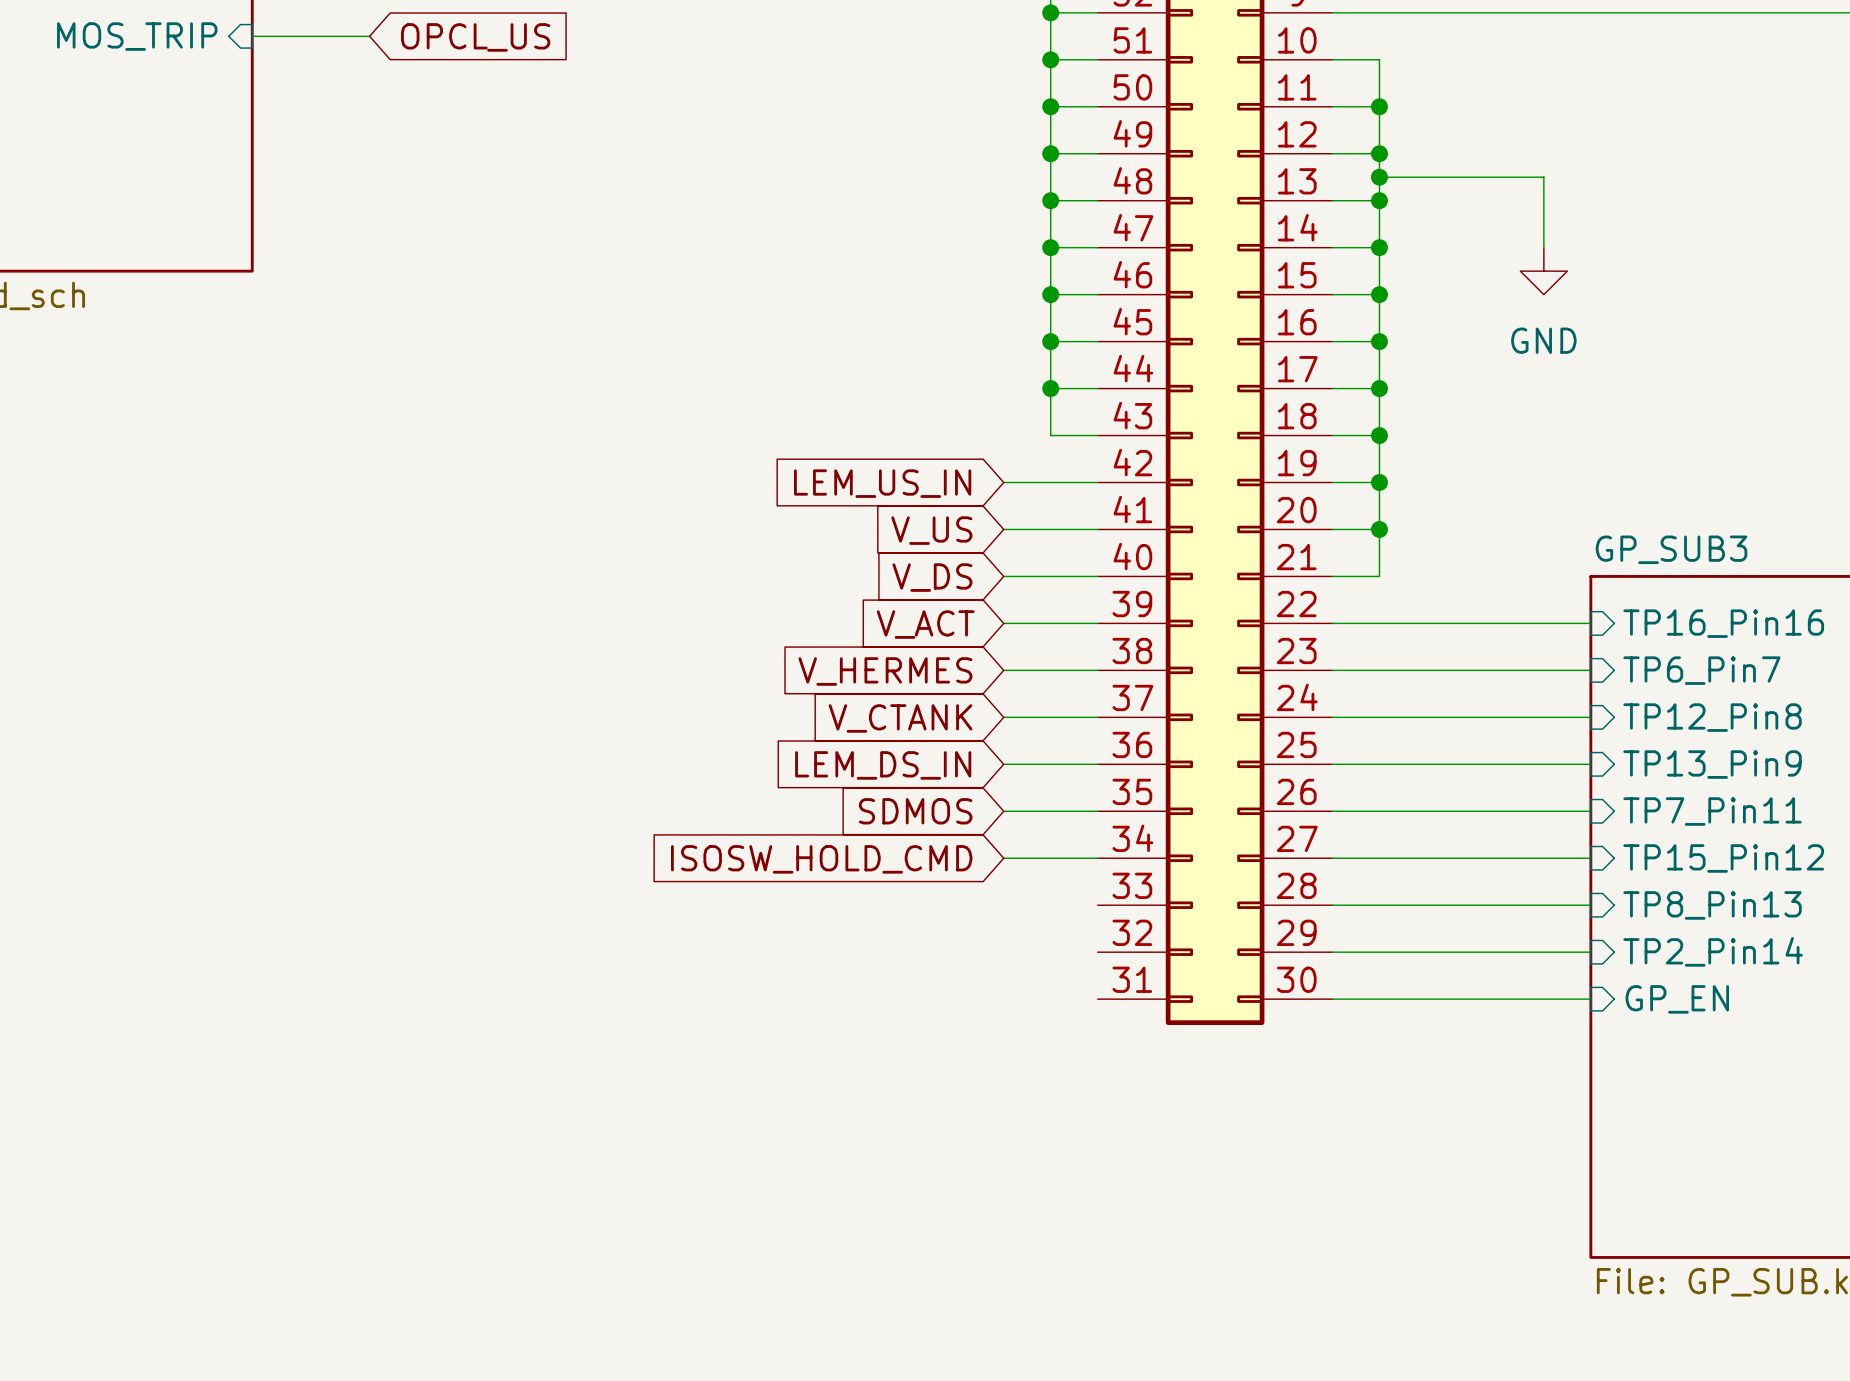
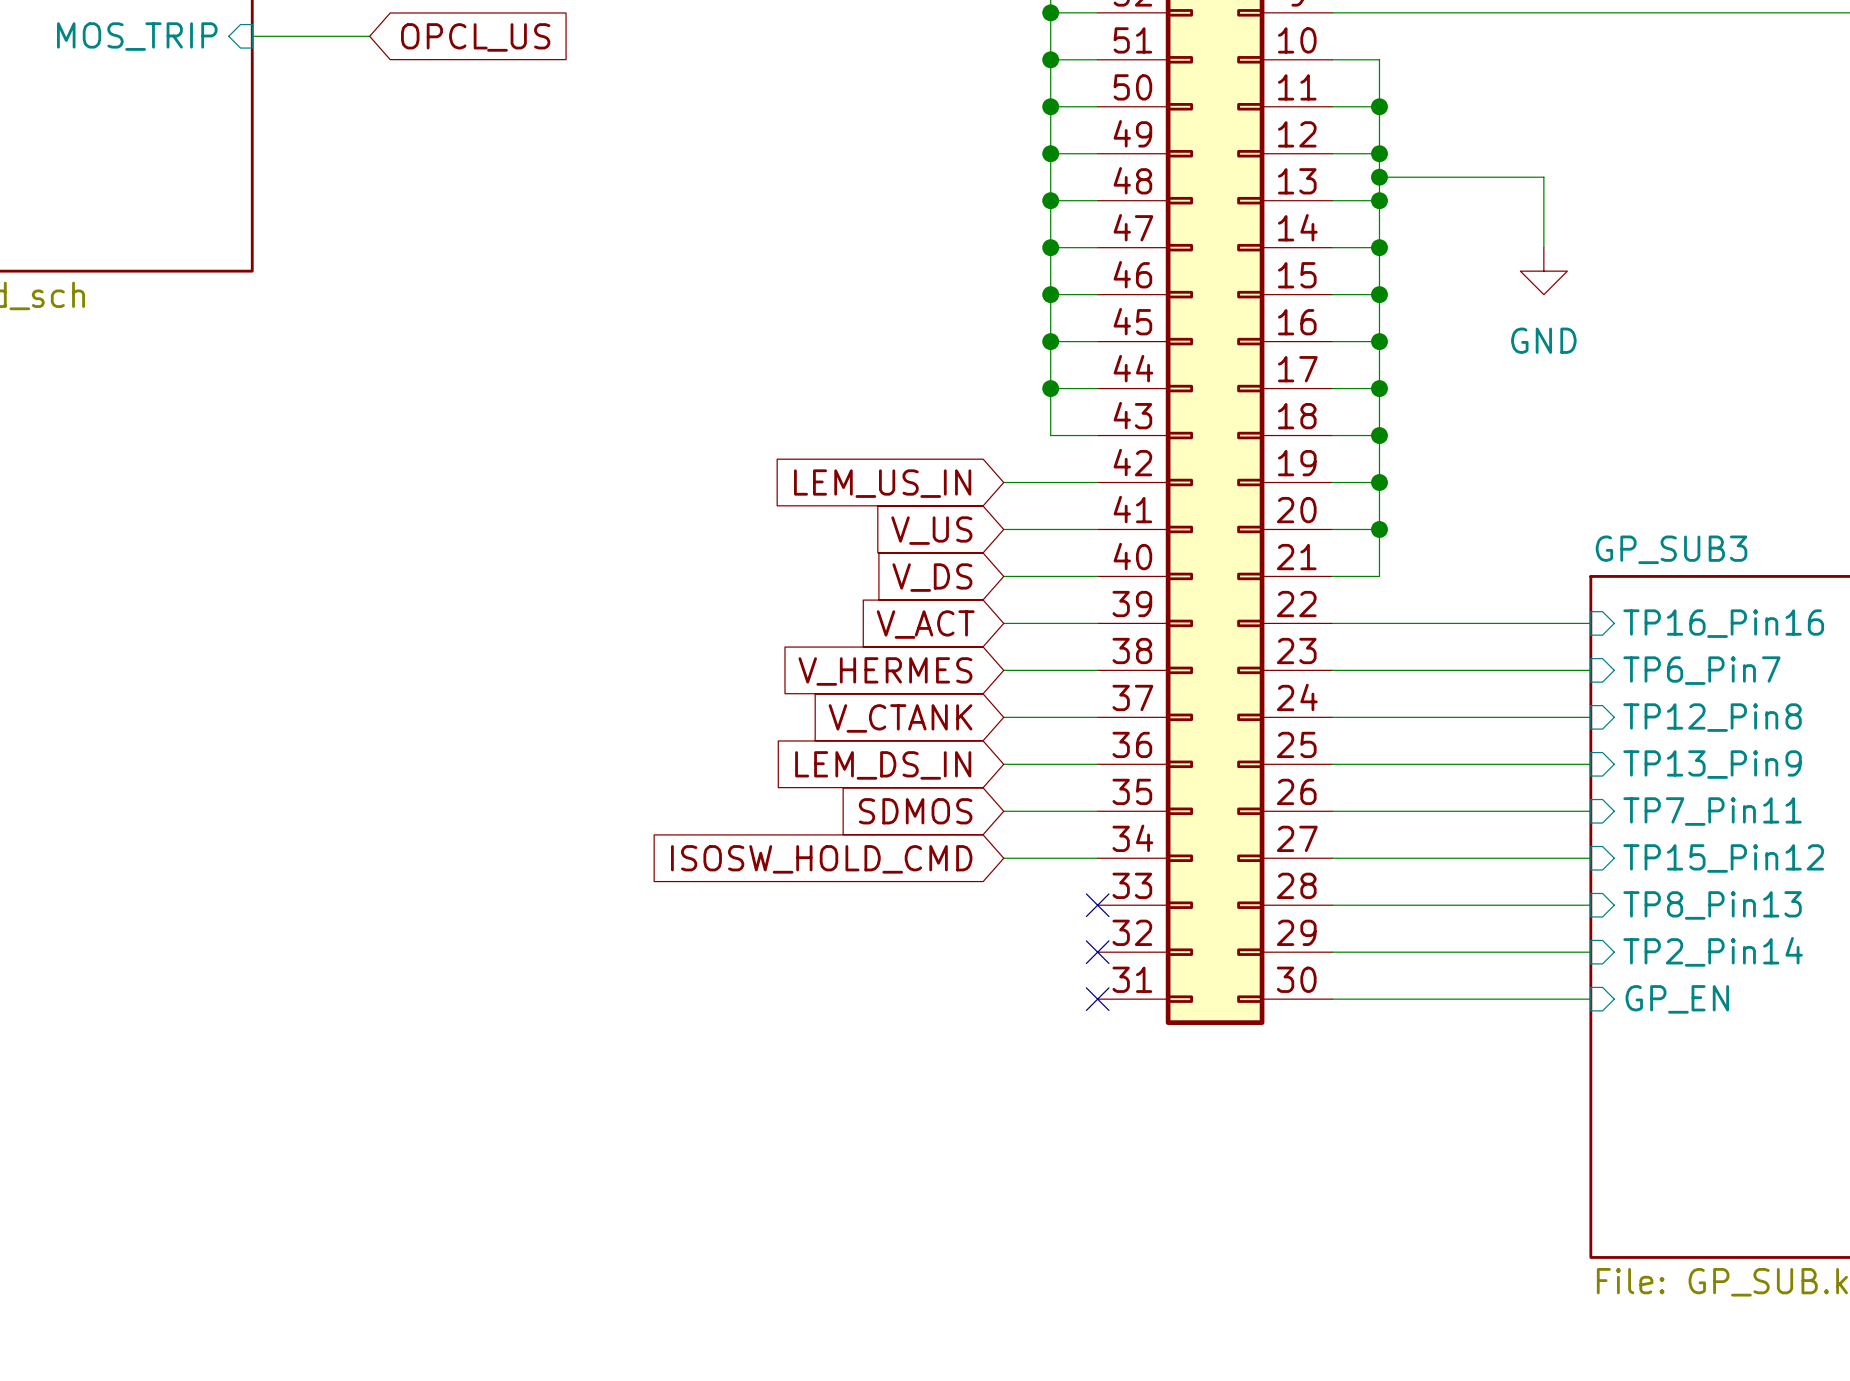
no-connect mark: none -> (1097, 905)
no-connect mark: none -> (1097, 952)
no-connect mark: none -> (1097, 999)

